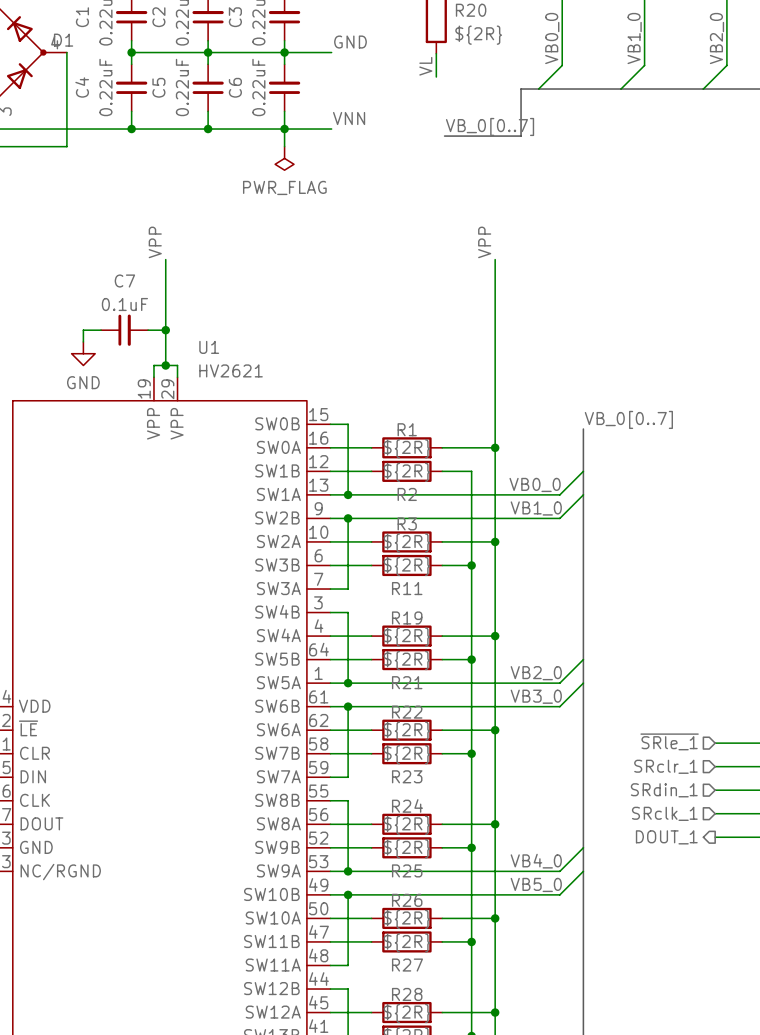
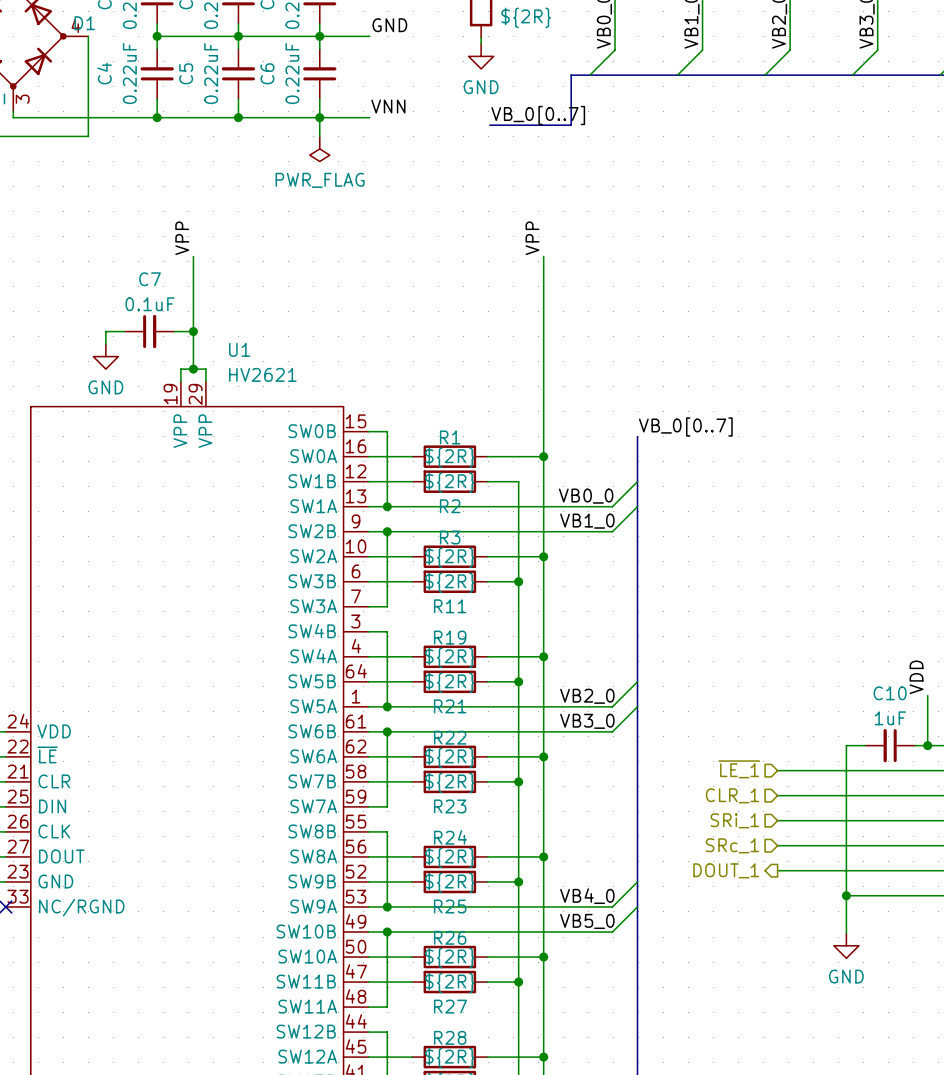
label: VL (425, 66) -> none
power symbol: none -> GND (481, 56)
hierarchical label: ~{SRle_1} (669, 741) -> ~{LE_1} (739, 769)
hierarchical label: SRclr_1 (665, 766) -> CLR_1 (732, 795)
hierarchical label: SRdin_1 (664, 790) -> SRi_1 (734, 820)
hierarchical label: SRclk_1 (664, 813) -> SRc_1 (732, 845)

